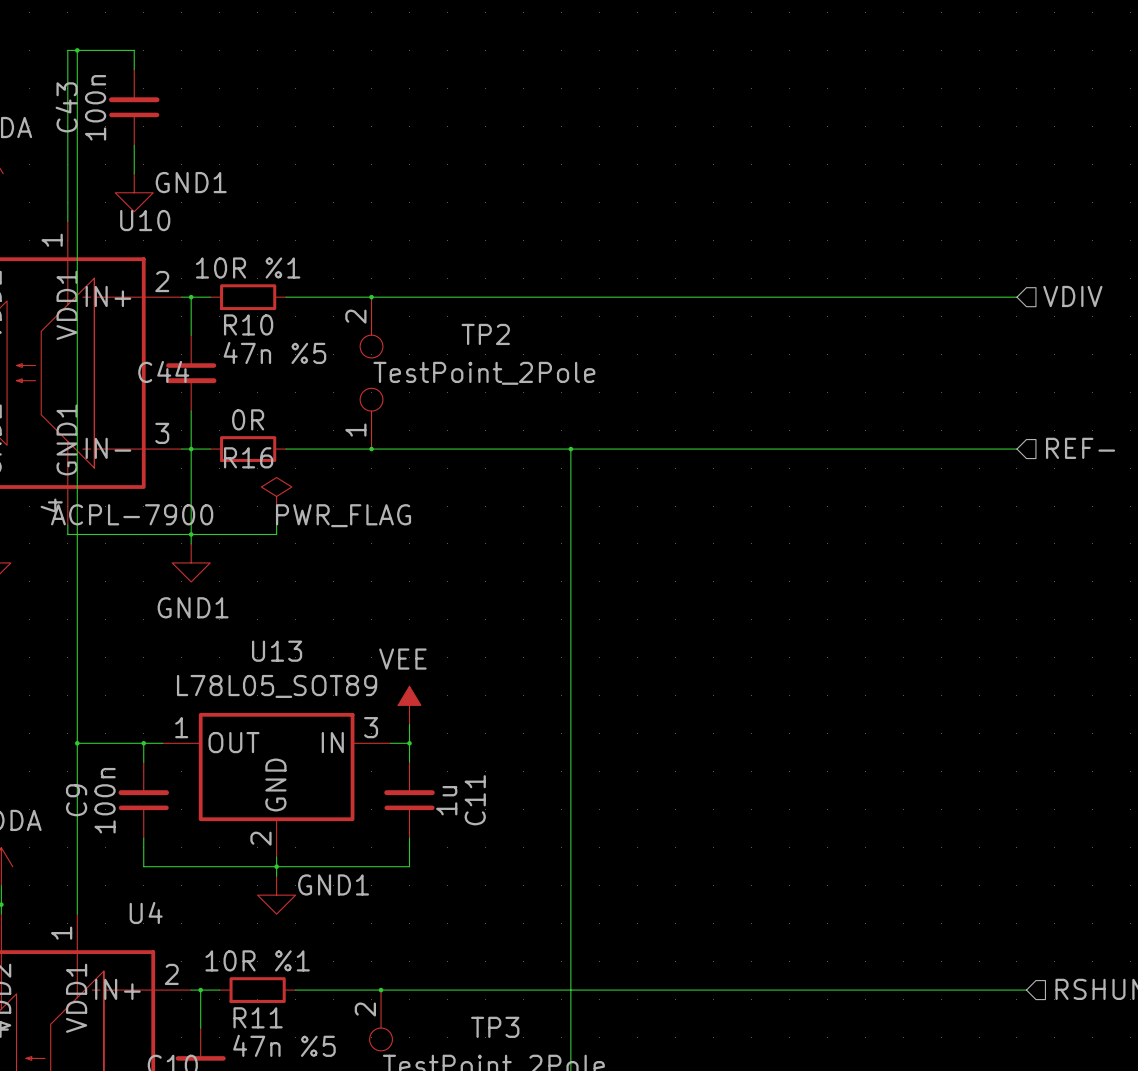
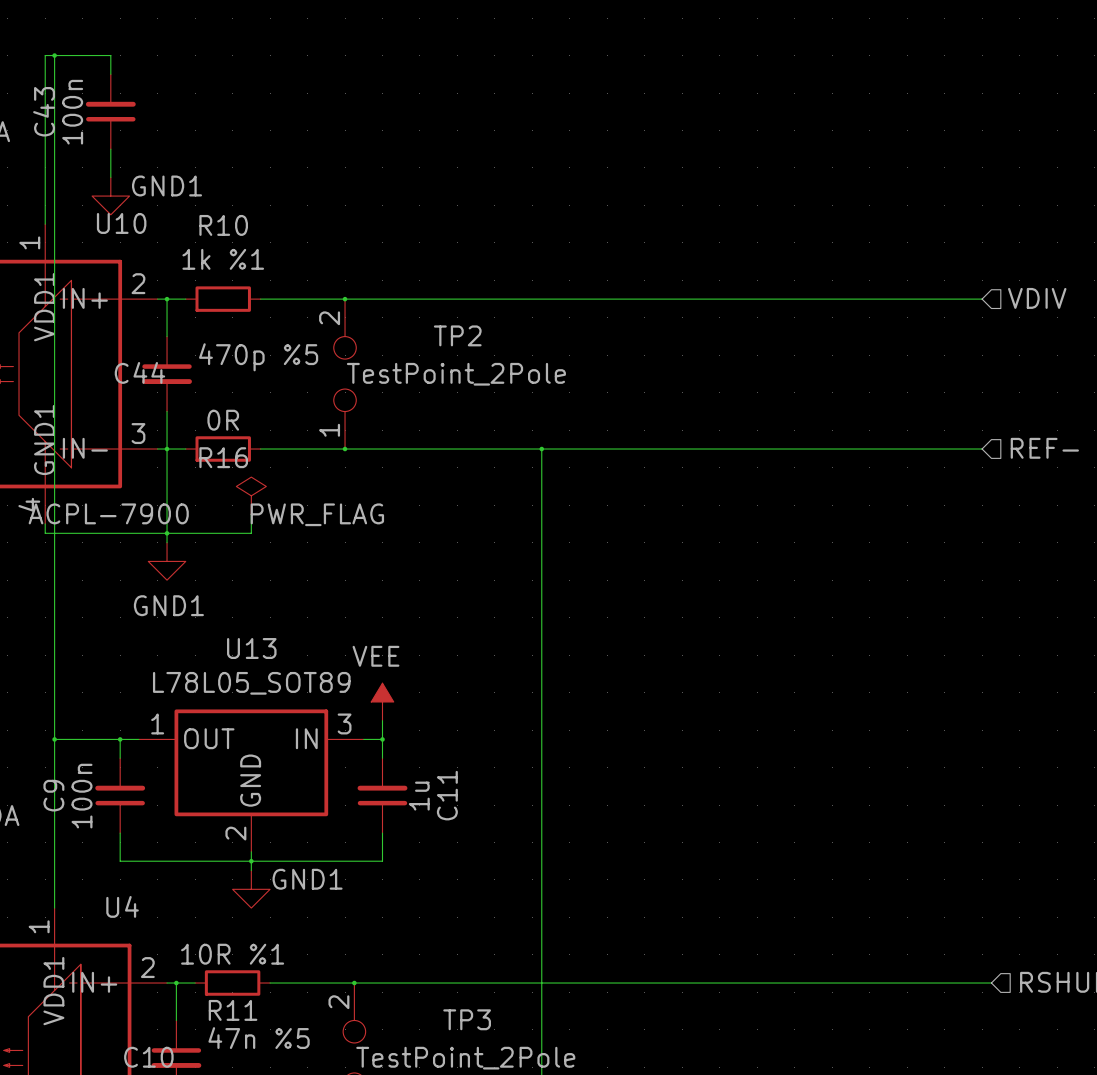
R10 value: 10R %1 (248, 268) -> 1k %1 (223, 259)
R10 name position: R10 (248, 324) -> R10 (223, 225)
C44 value: 47n %5 (274, 352) -> 470p %5 (258, 357)

